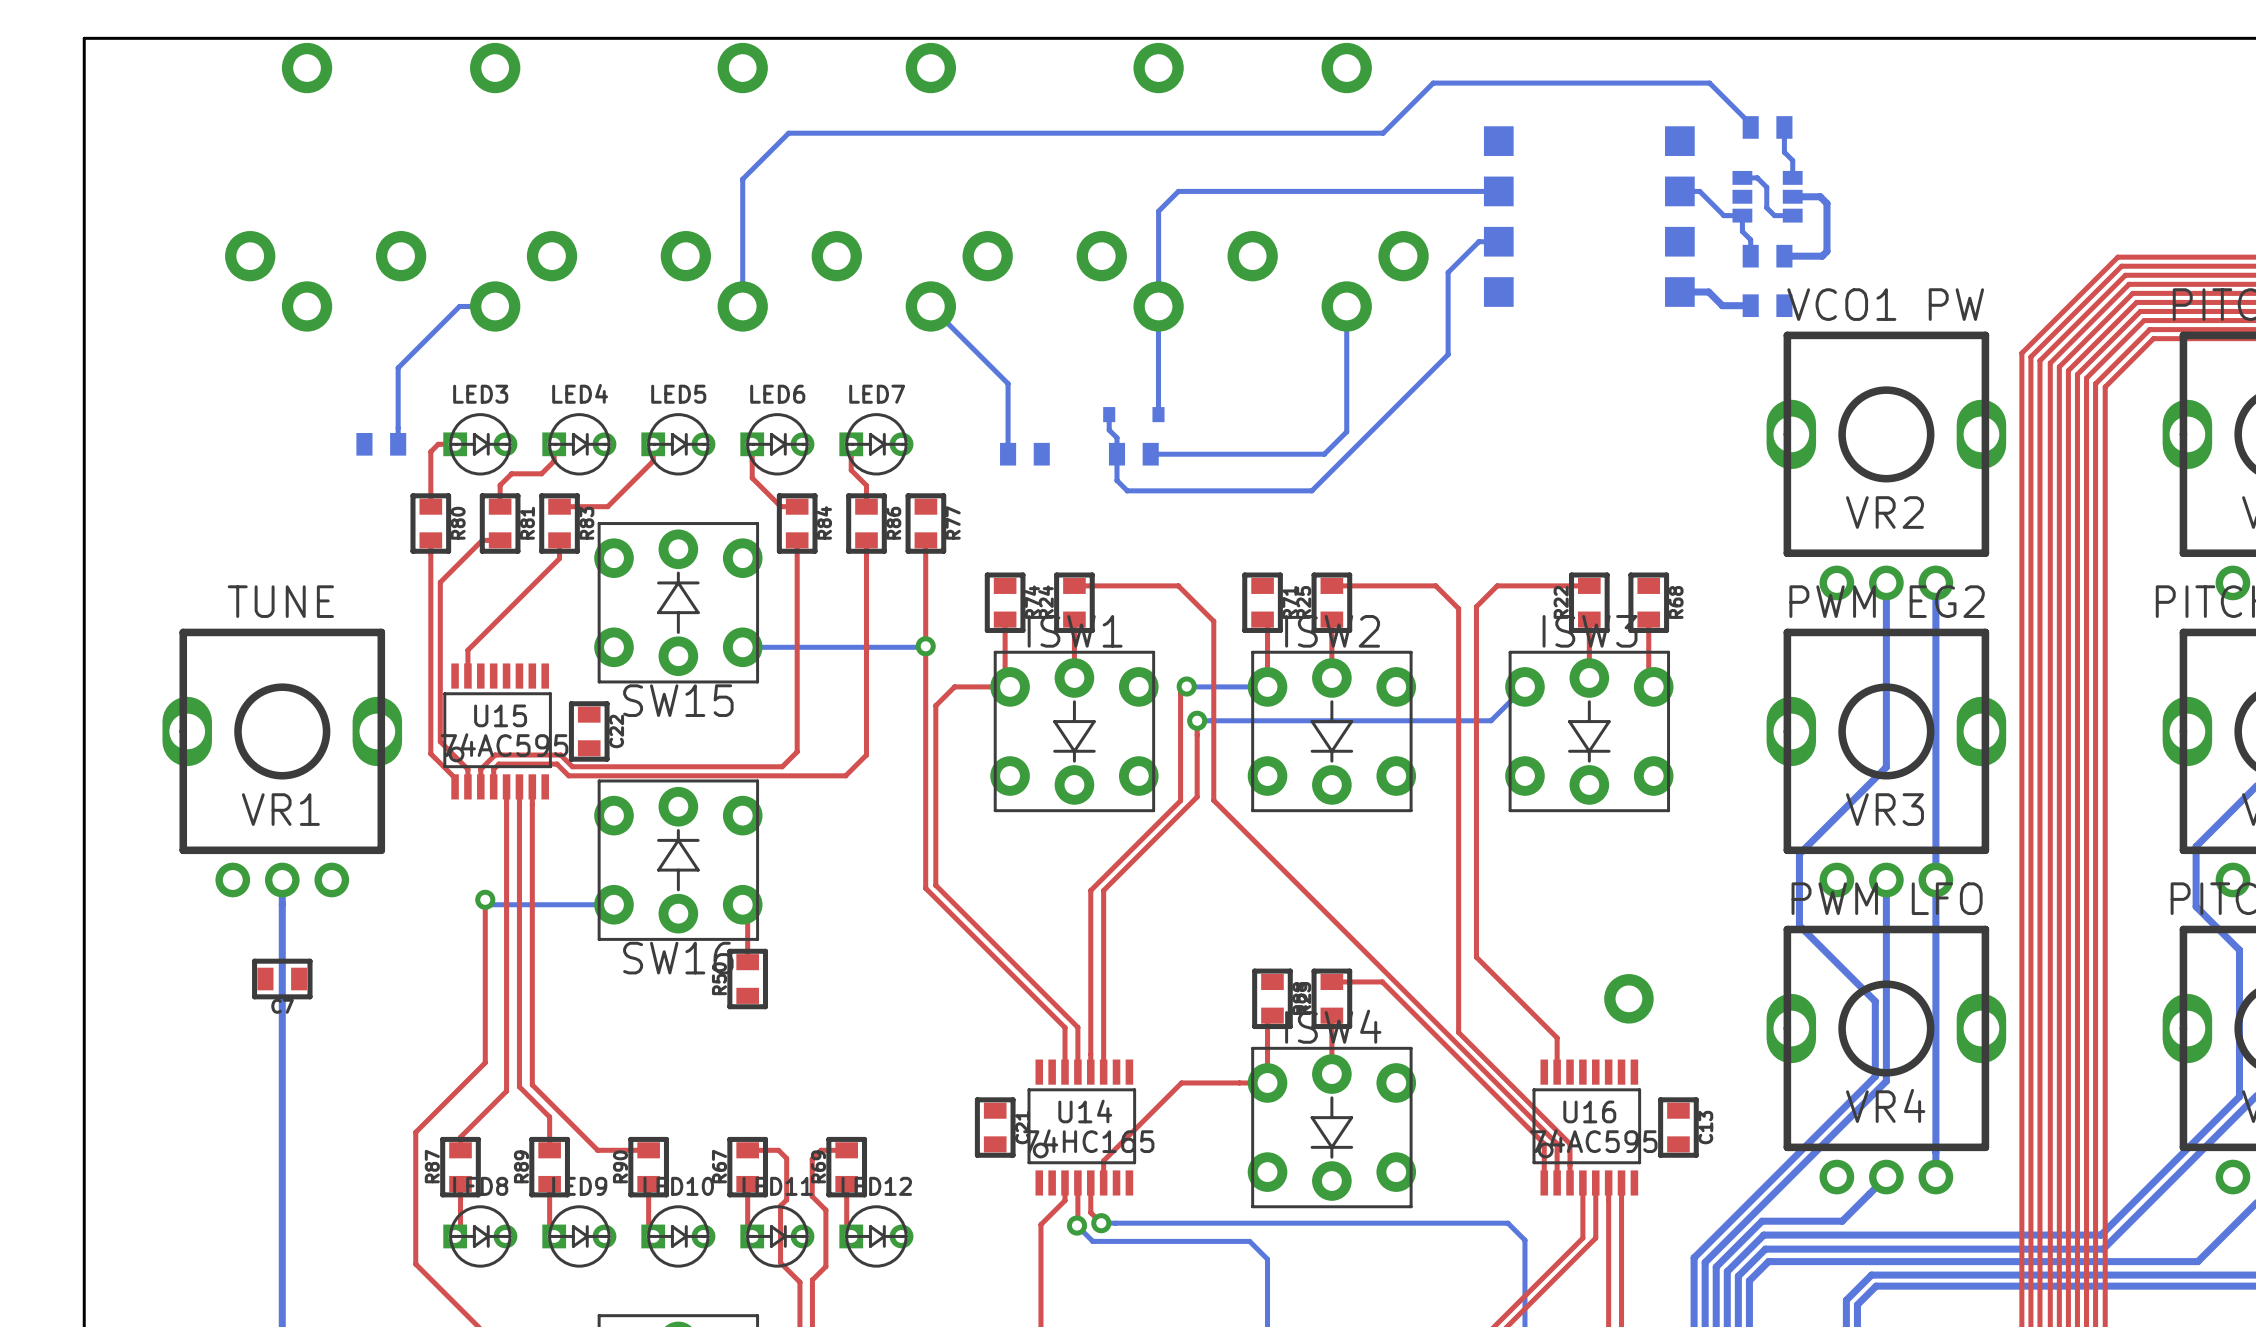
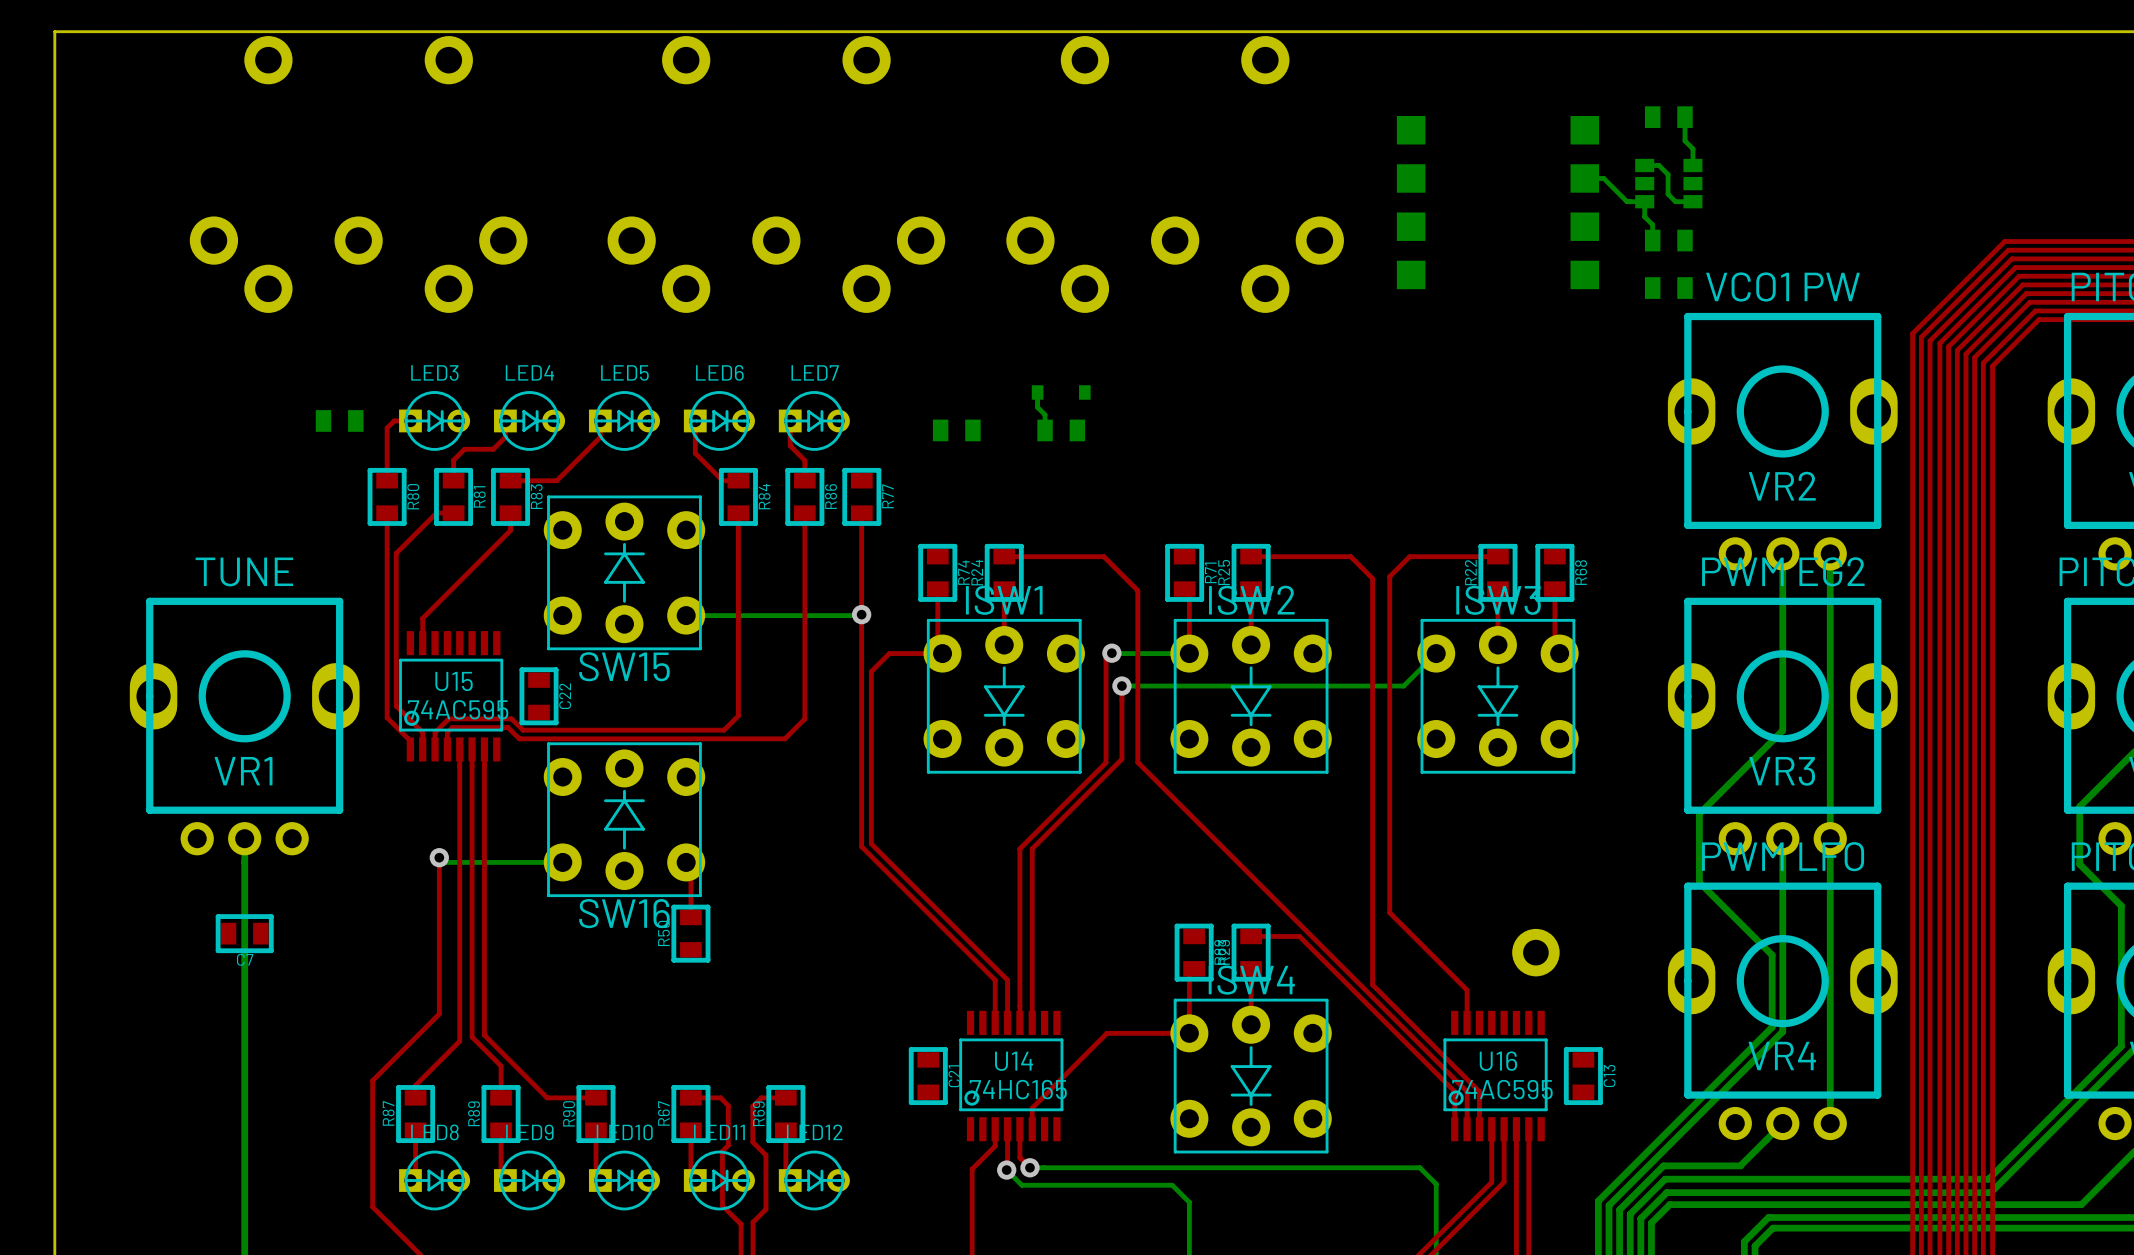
bottom track: (1750, 127) (1750, 124) (1709, 83) (1433, 83) (1383, 133) (788, 133) (742, 179) (742, 306) -> none
bottom track: (1498, 191) (1178, 191) (1158, 211) (1158, 306) -> none
bottom track: (1792, 196) (1820, 196) (1826, 203) (1826, 251) (1822, 256) (1784, 256) -> none
bottom track: (1498, 241) (1478, 241) (1448, 272) (1448, 354) (1311, 490) (1127, 490) (1116, 480) (1116, 454) -> none
bottom track: (1679, 292) (1708, 292) (1722, 305) (1750, 305) -> none
bottom track: (495, 306) (459, 306) (398, 367) (398, 444) -> none
bottom track: (930, 306) (1008, 383) (1008, 454) -> none
bottom track: (1158, 306) (1158, 414) -> none
bottom track: (1346, 306) (1346, 431) (1324, 454) (1150, 454) -> none

